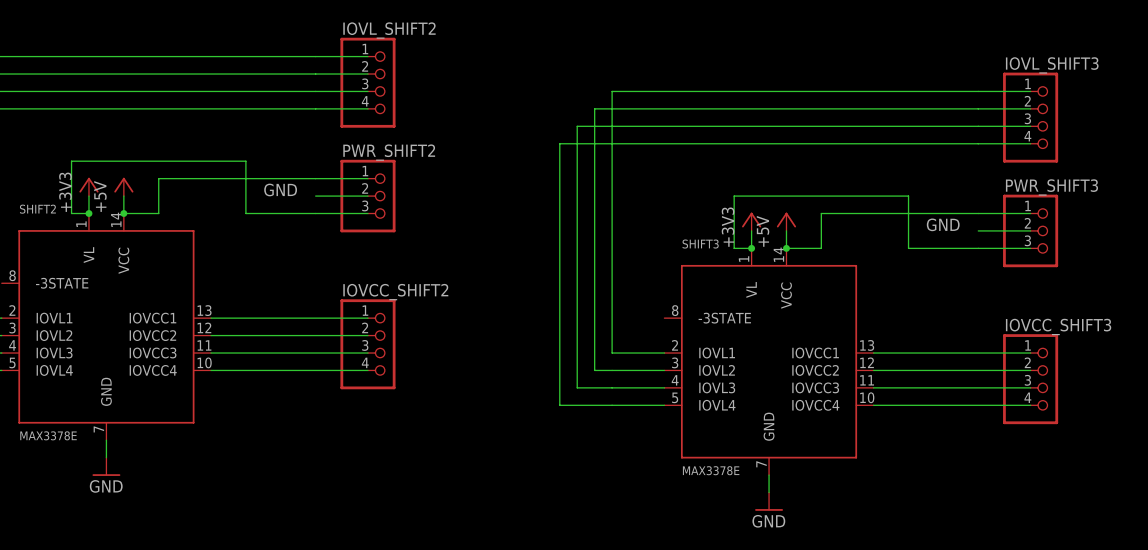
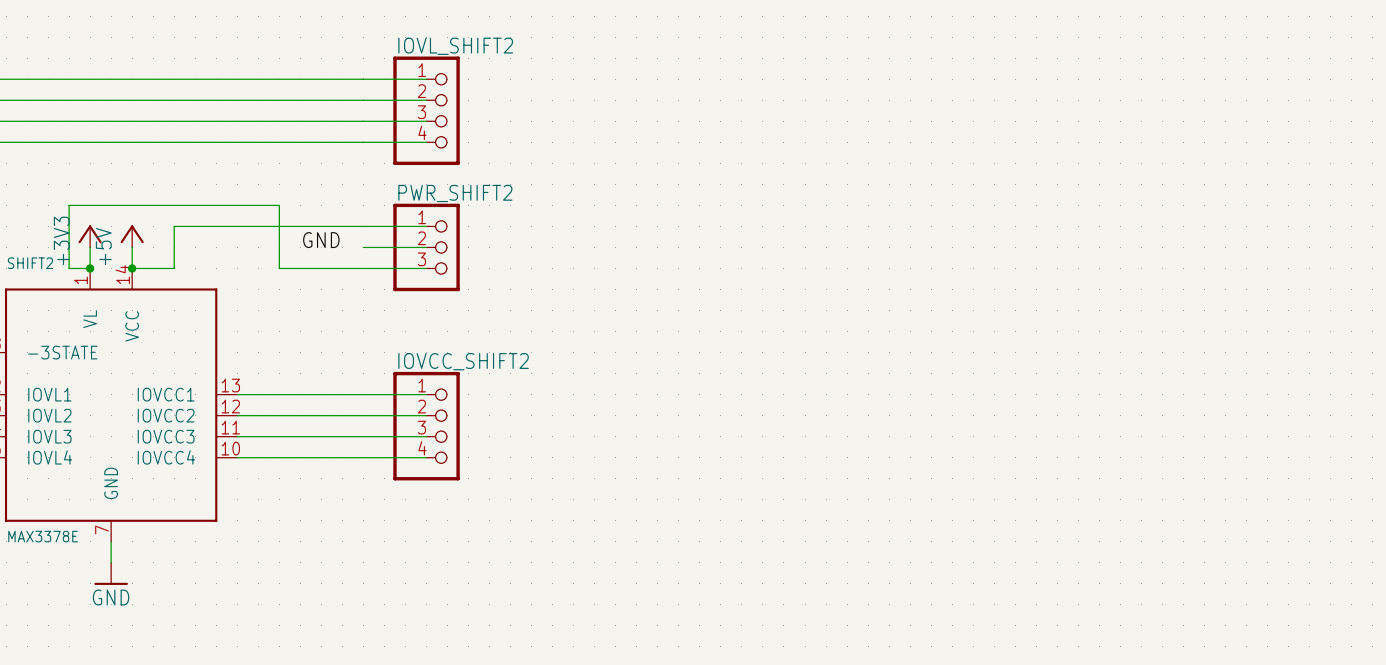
wire: (1030, 91) (612, 91) (612, 353) (664, 353) -> none
wire: (1030, 108) (594, 108) (594, 370) (664, 370) -> none
IOVL_SHIFT3: (1030, 117) -> none
wire: (1030, 126) (577, 126) (577, 387) (664, 387) -> none
wire: (1030, 143) (559, 143) (559, 405) (664, 405) -> none
wire: (1030, 213) (821, 213) (821, 248) (786, 248) (786, 230) -> none
power symbol: +3V3 (751, 221) -> none
power symbol: +5V (786, 221) -> none
label: GND (943, 224) -> none
wire: (751, 230) (751, 248) (734, 248) (734, 196) (908, 196) (908, 248) (1030, 248) -> none
wire: (978, 230) (1030, 230) -> none
PWR_SHIFT3: (1030, 230) -> none
junction: (751, 248) -> none
junction: (786, 248) -> none
wire: (873, 353) (1030, 353) -> none
SHIFT3: MAX3378E (769, 361) -> none
wire: (873, 370) (1030, 370) -> none
IOVCC_SHIFT3: (1030, 379) -> none
wire: (873, 387) (1030, 387) -> none
wire: (873, 405) (1030, 405) -> none
wire: (769, 475) (769, 492) -> none
power symbol: GND (769, 501) -> none

